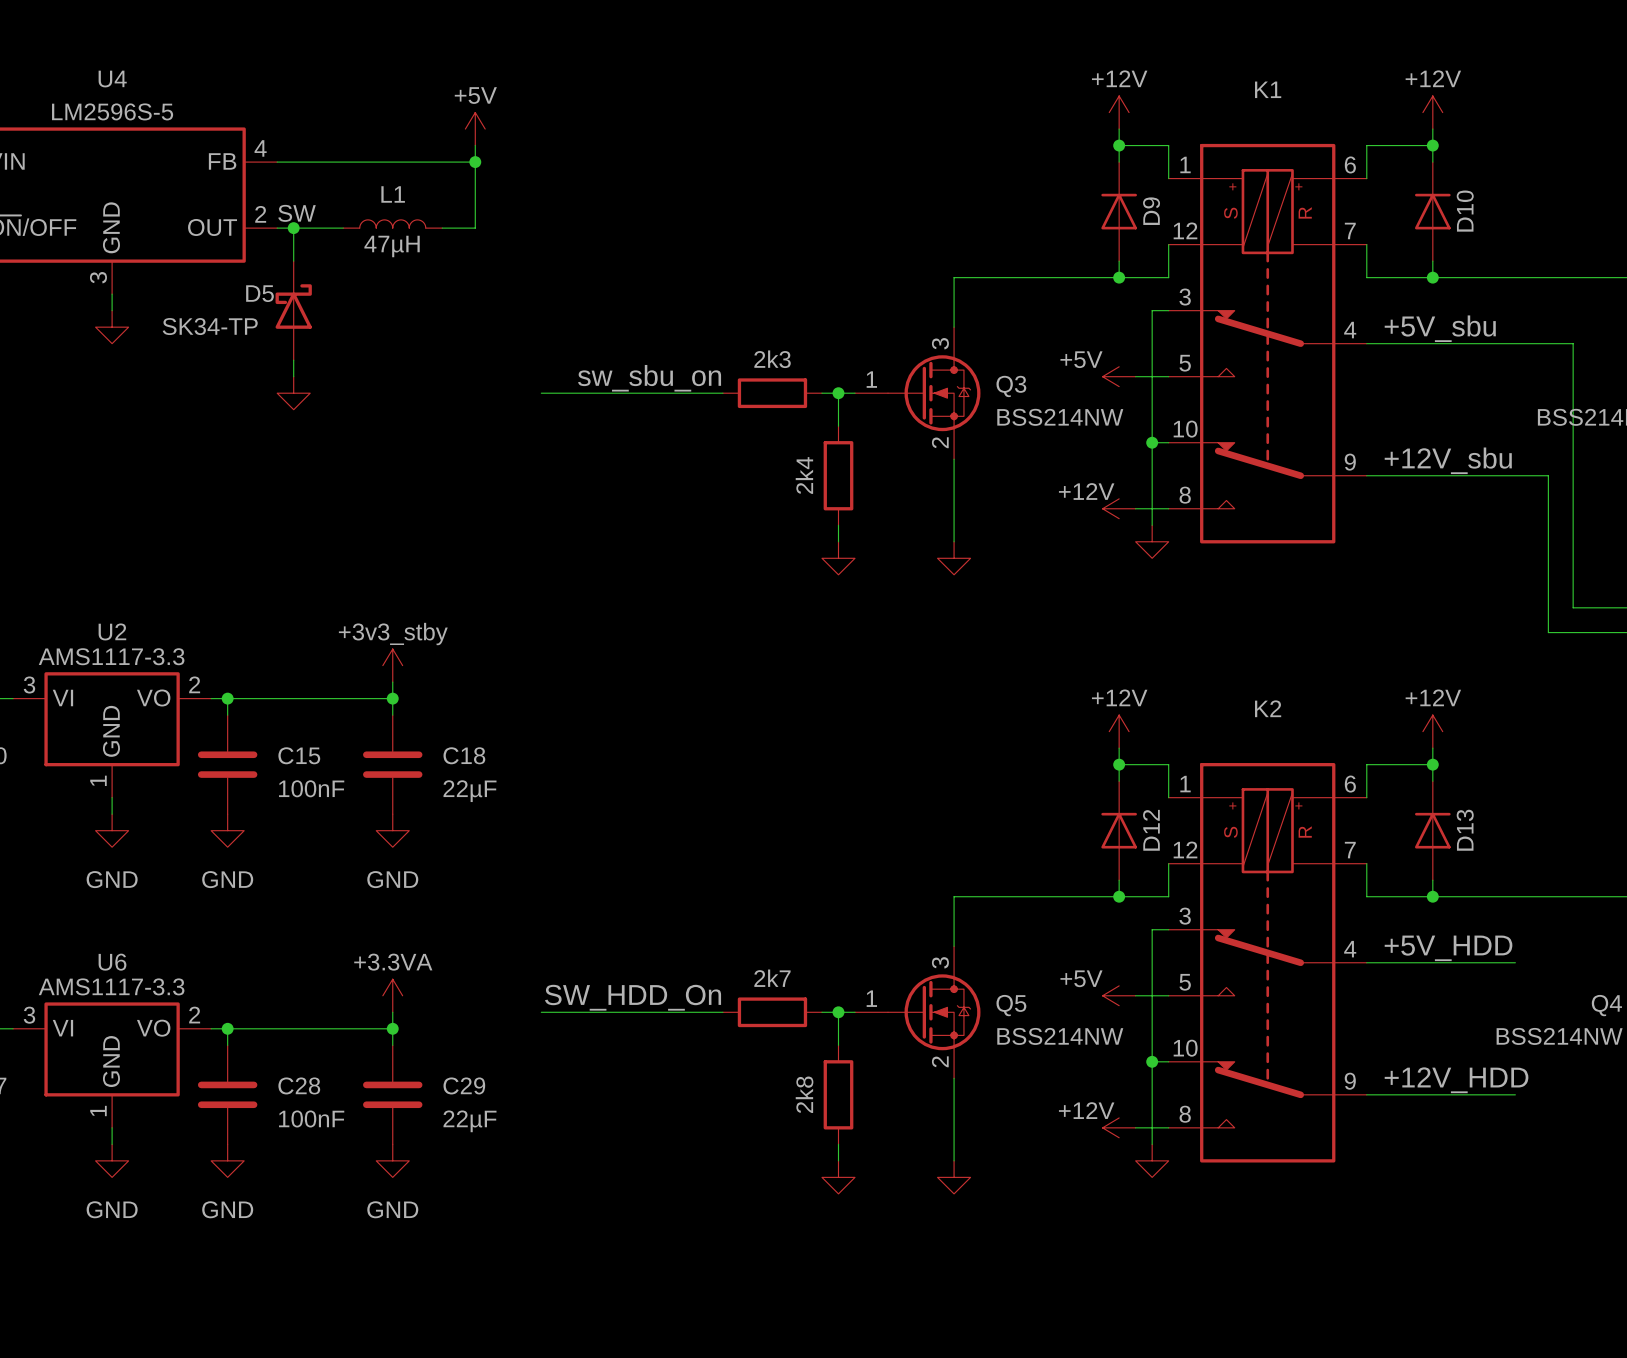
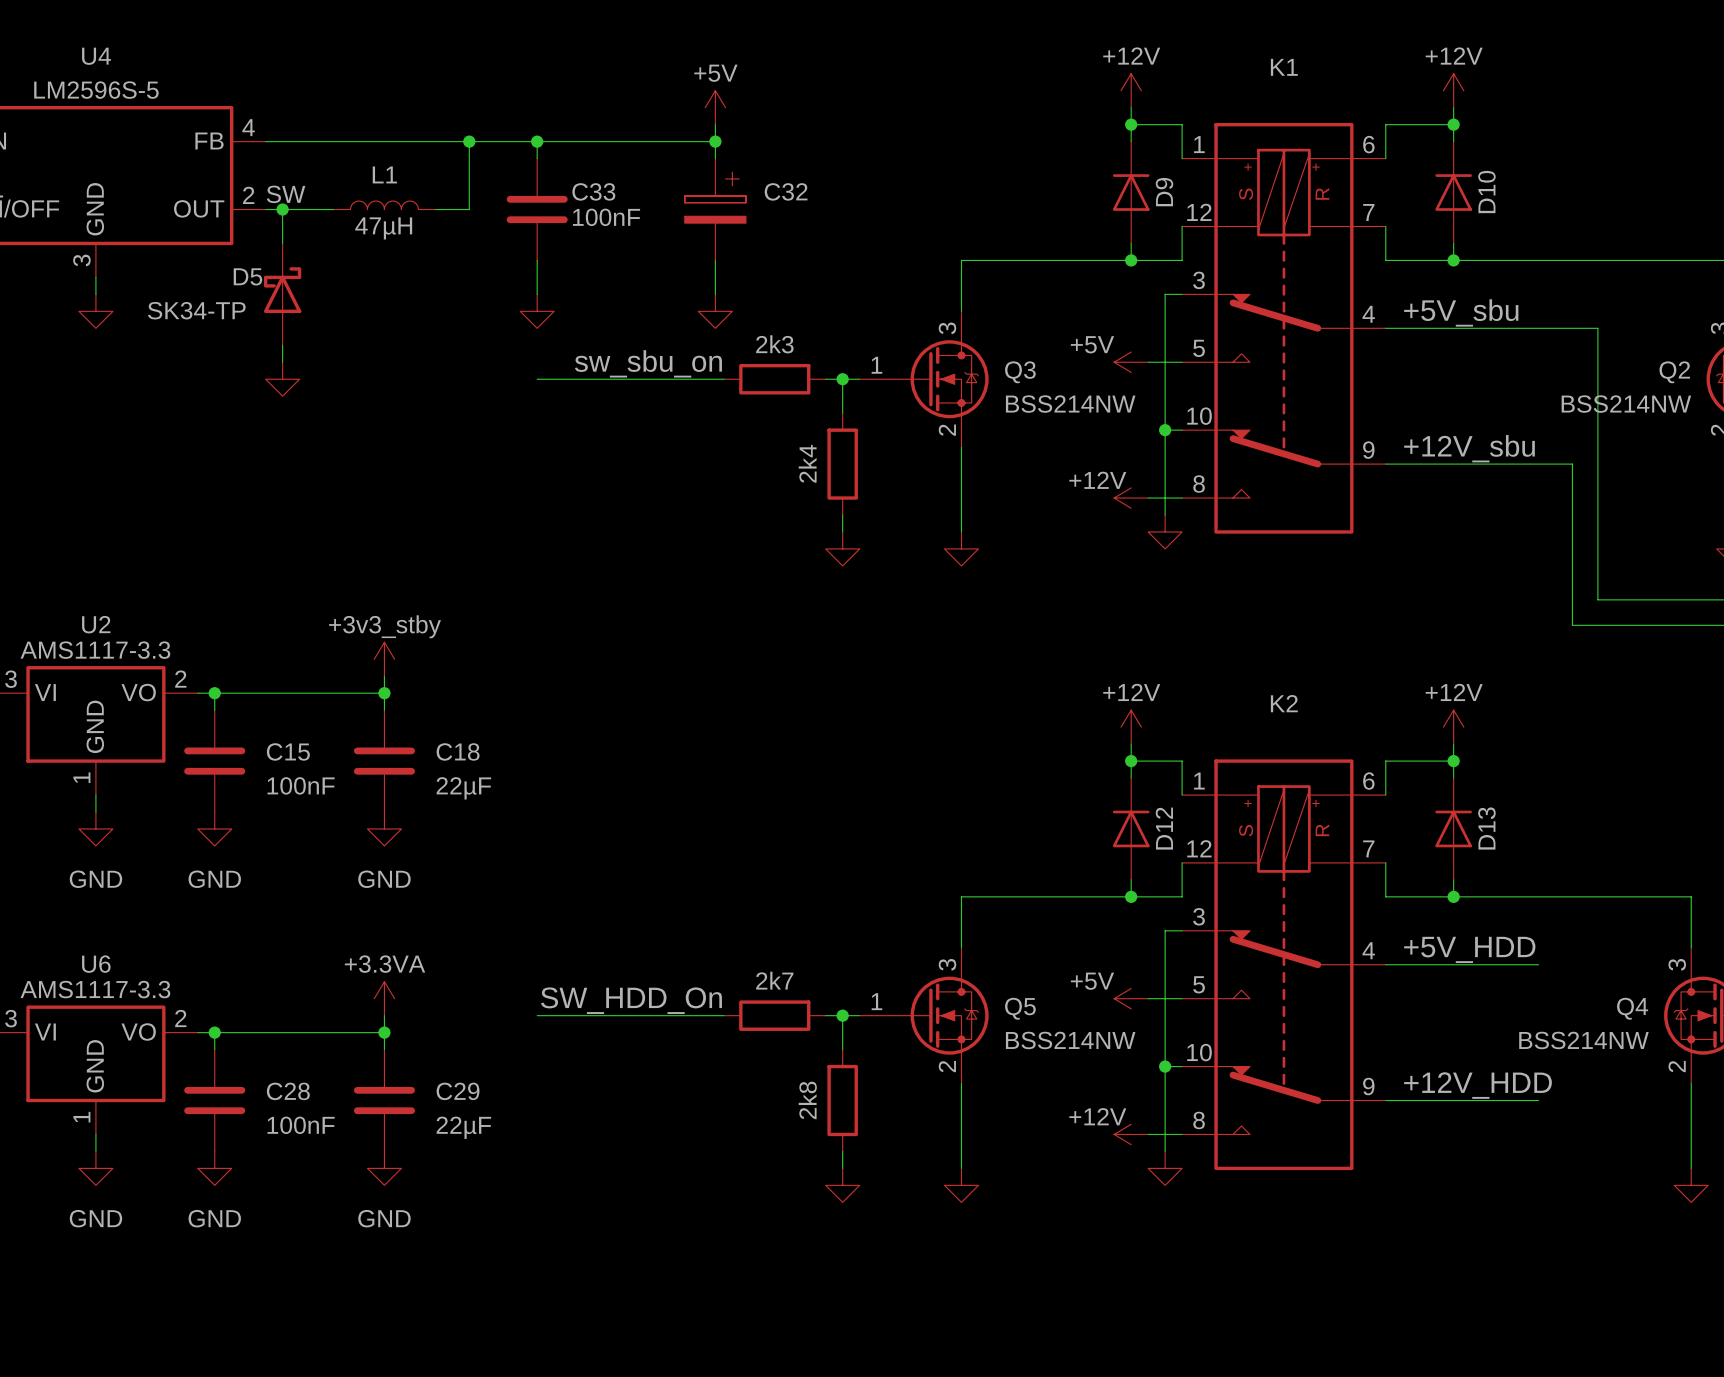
power symbol position: +5V (475, 129) -> +5V (715, 107)
wire: (475, 145) (475, 162) -> (715, 141) (469, 141)
wire: none -> (715, 124) (715, 158)
wire: none -> (537, 141) (537, 158)
junction: none -> (537, 141)
junction: none -> (715, 141)
C33: none -> 100nF (537, 209)
C32: none -> (715, 209)
wire: none -> (537, 260) (537, 294)
wire: none -> (715, 260) (715, 294)
power symbol: none -> (537, 311)
power symbol: none -> (715, 311)

